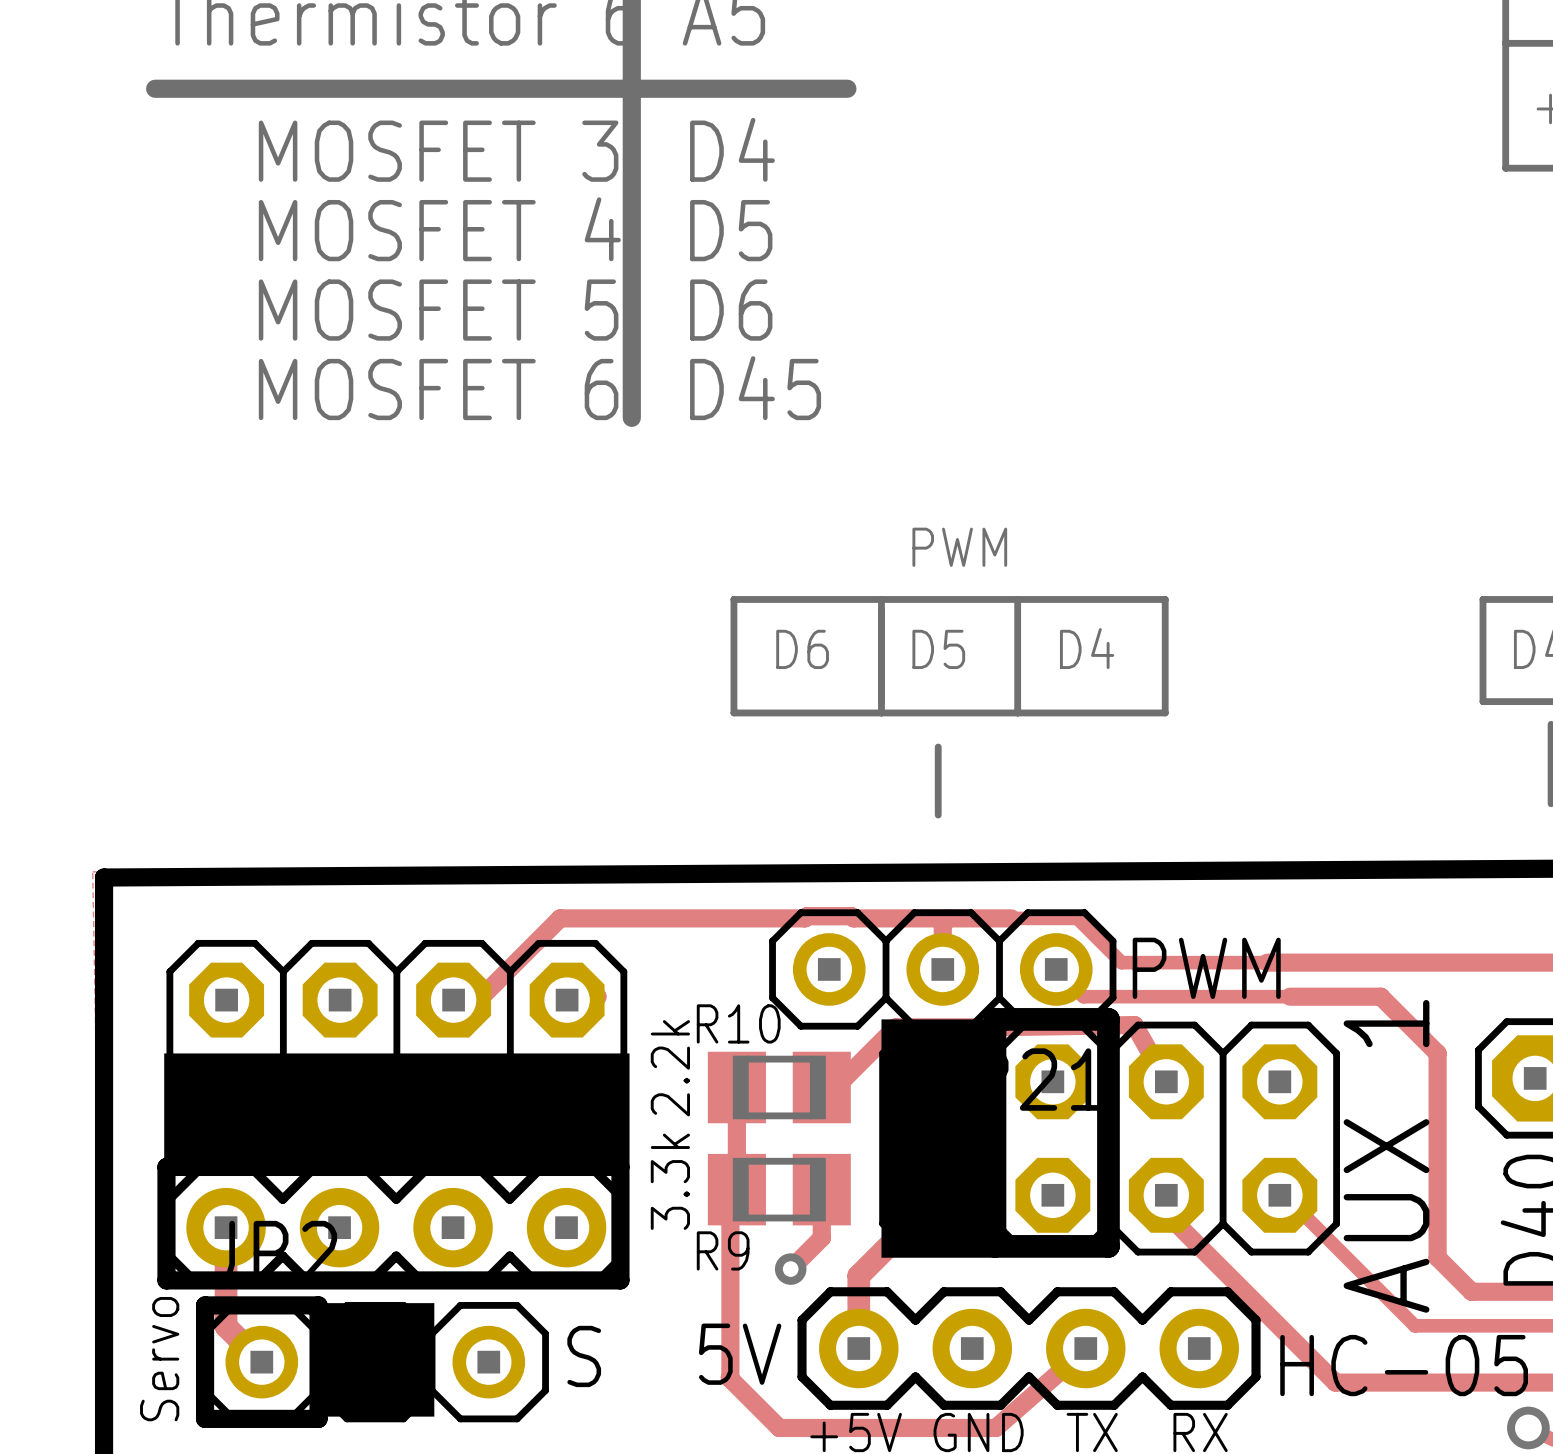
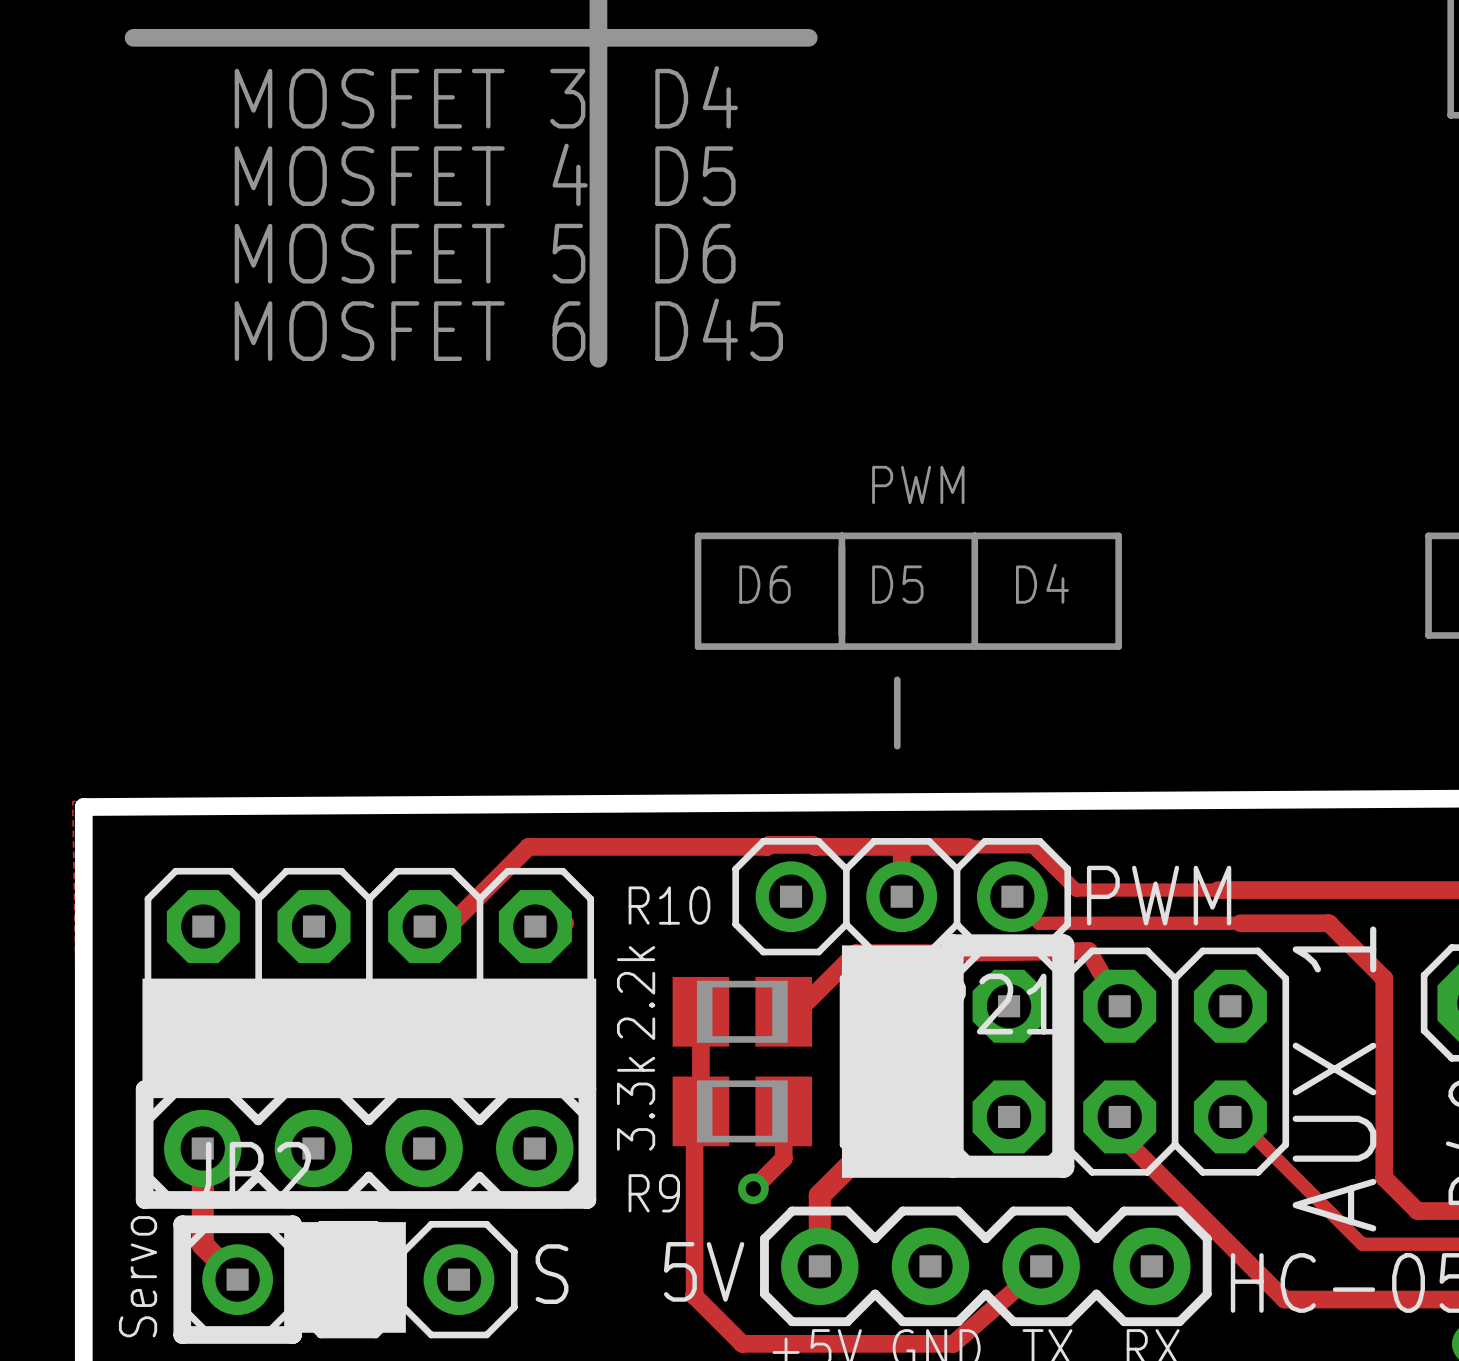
text position: R10 (738, 1023) -> R10 (669, 905)
text position: R9 (723, 1250) -> R9 (654, 1193)

